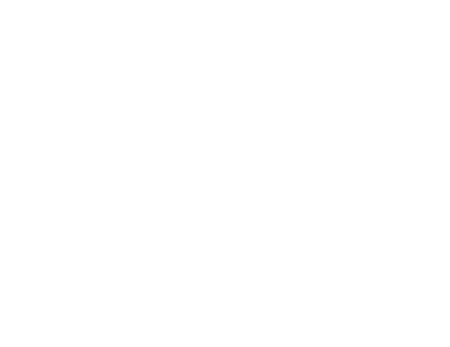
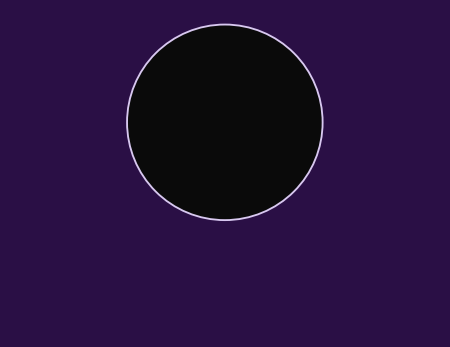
part: none -> (224, 122)

